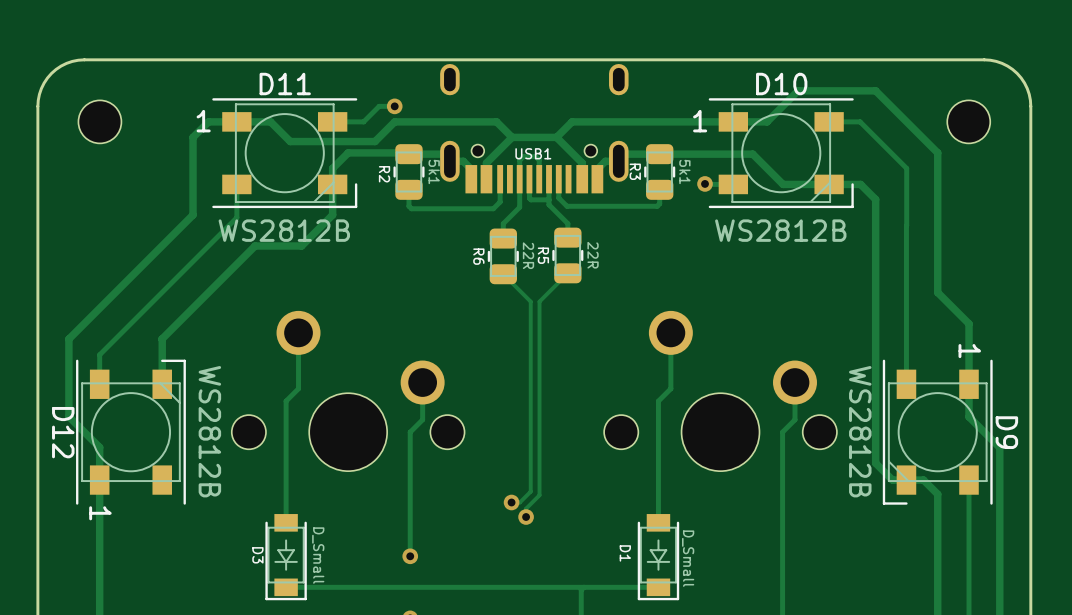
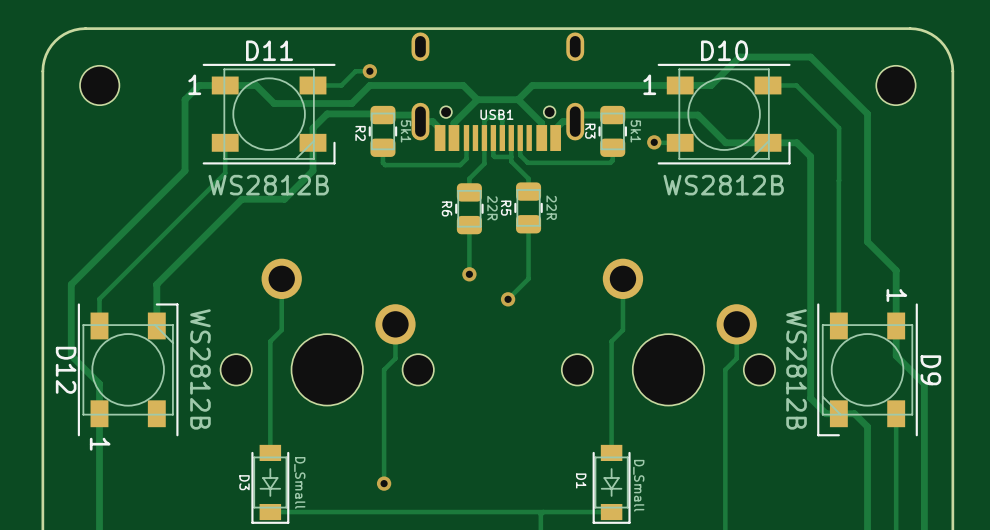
track: (567, 273) (539, 301) (539, 495) (526, 508) (526, 517) -> (528, 224) (528, 278) (508, 299)
track: (503, 274) (530, 301) (530, 491) (519, 502) (511, 502) -> (469, 225) (469, 274)
via: none -> (469, 274)
via: none -> (508, 299)
via: (511, 502) -> none
via: (526, 517) -> none

